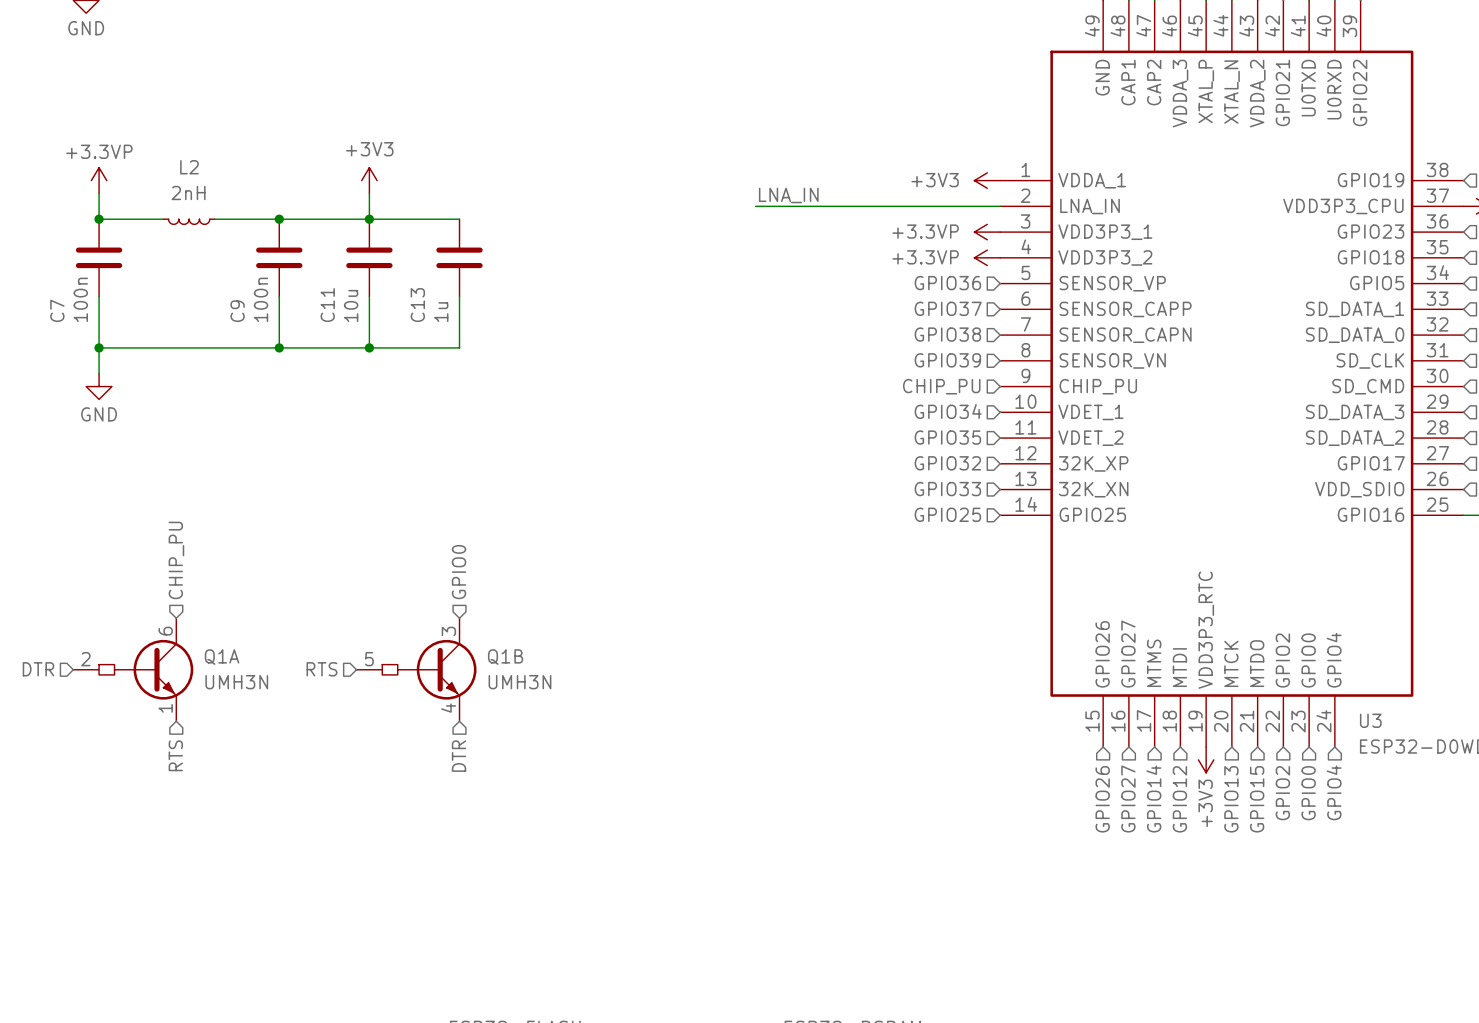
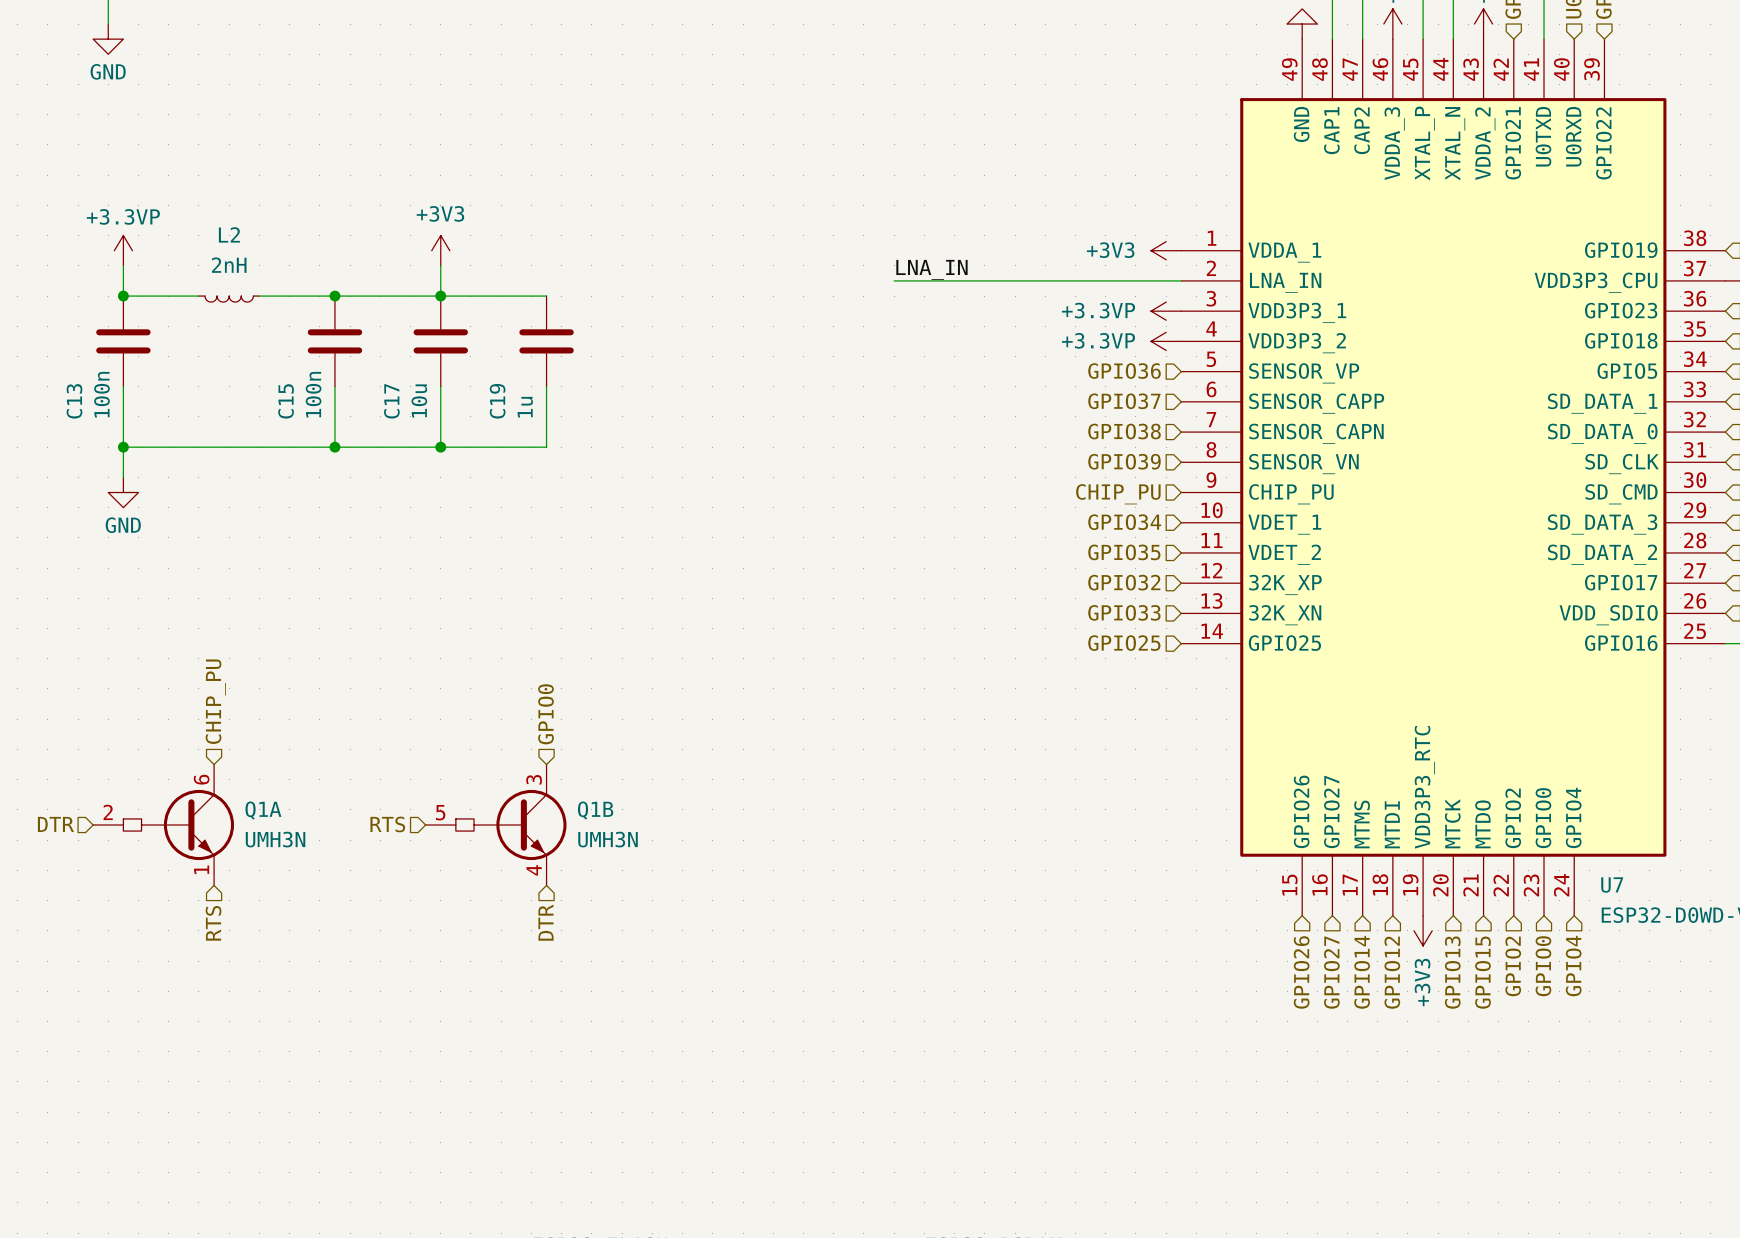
C11 name: C11 (327, 305) -> C17 (391, 401)
C13 name: C13 (417, 305) -> C19 (497, 401)
C7 name: C7 (57, 310) -> C13 (74, 401)
C9 name: C9 (237, 311) -> C15 (286, 401)
U3 name: U3 (1370, 720) -> U7 (1612, 885)

